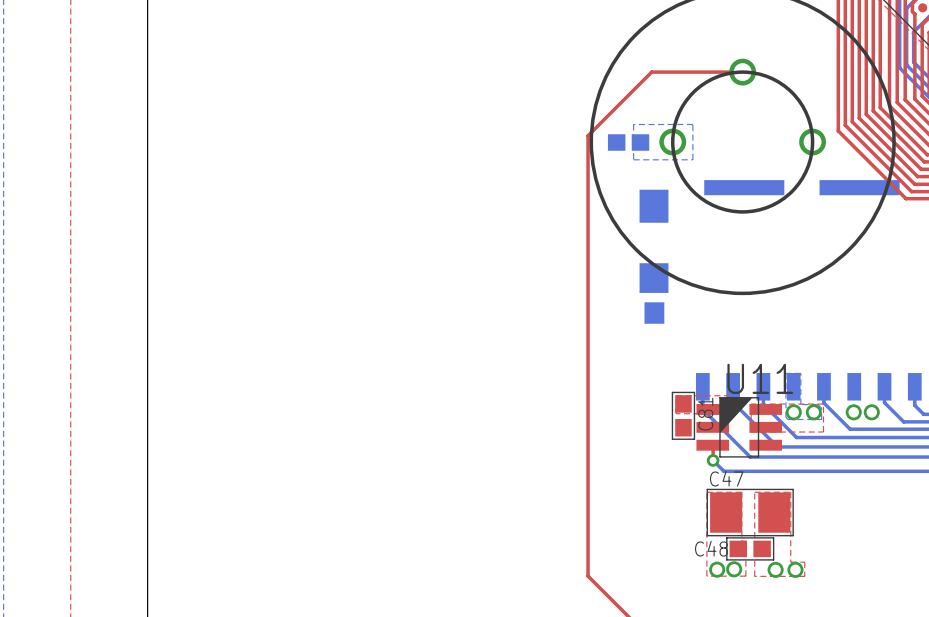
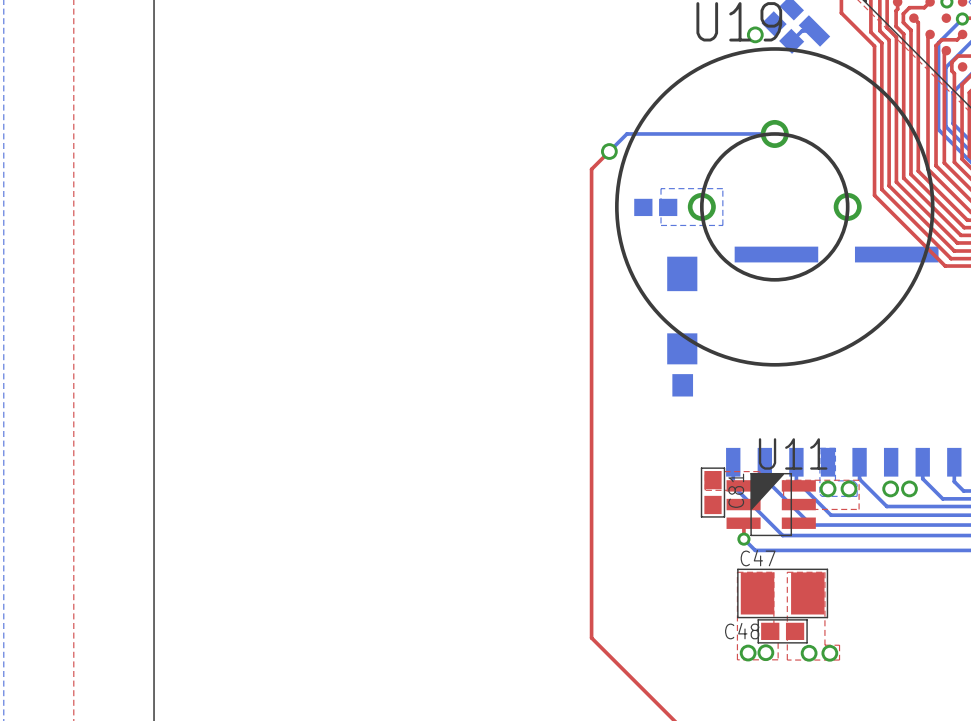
top track: (742, 72) (651, 72) (588, 135) (588, 576) -> (609, 151) (591, 169) (591, 637) (613, 659)
bottom track: none -> (774, 133) (626, 133) (609, 151)
via: none -> (609, 151)

